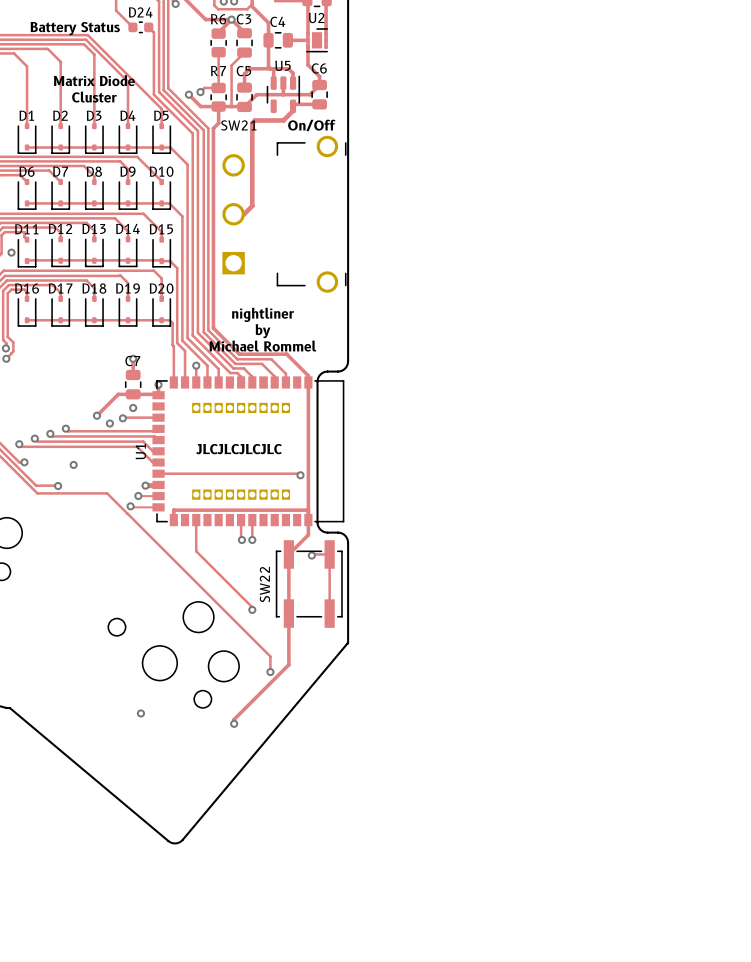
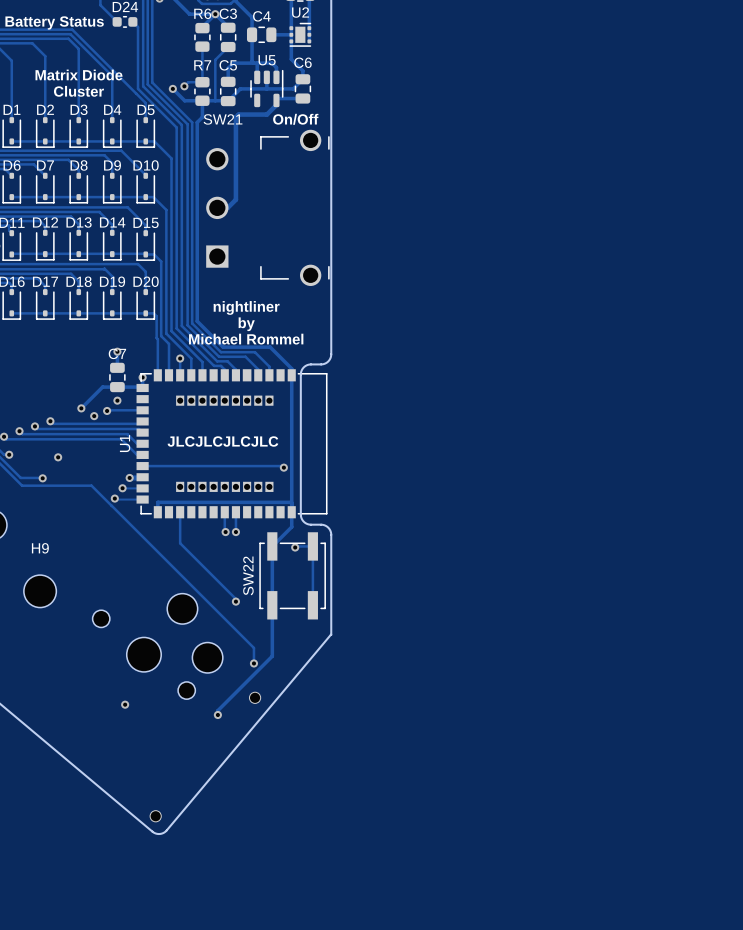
H9: none -> (40, 591)
part: none -> (255, 697)
part: none -> (155, 816)

